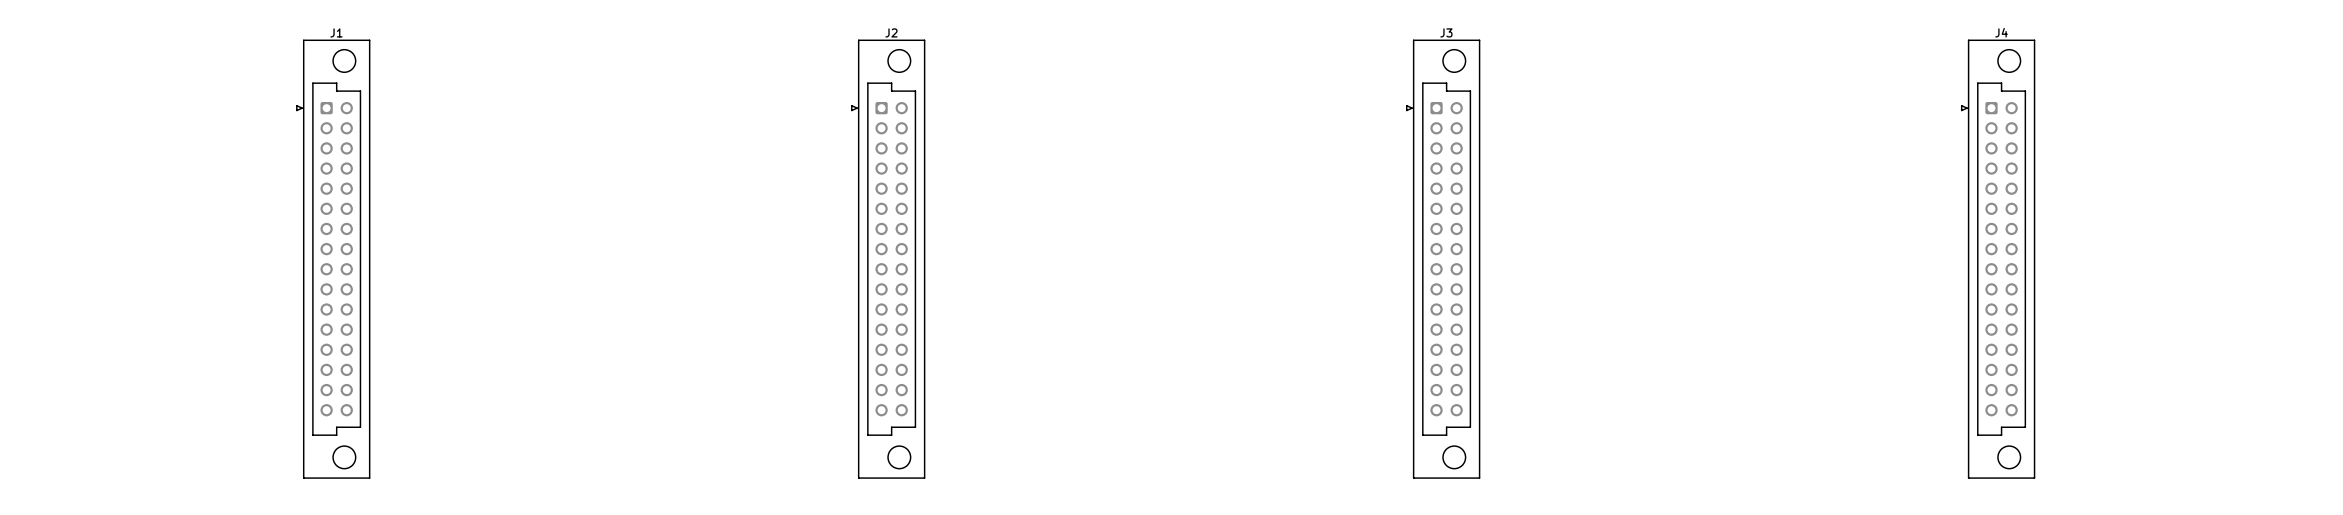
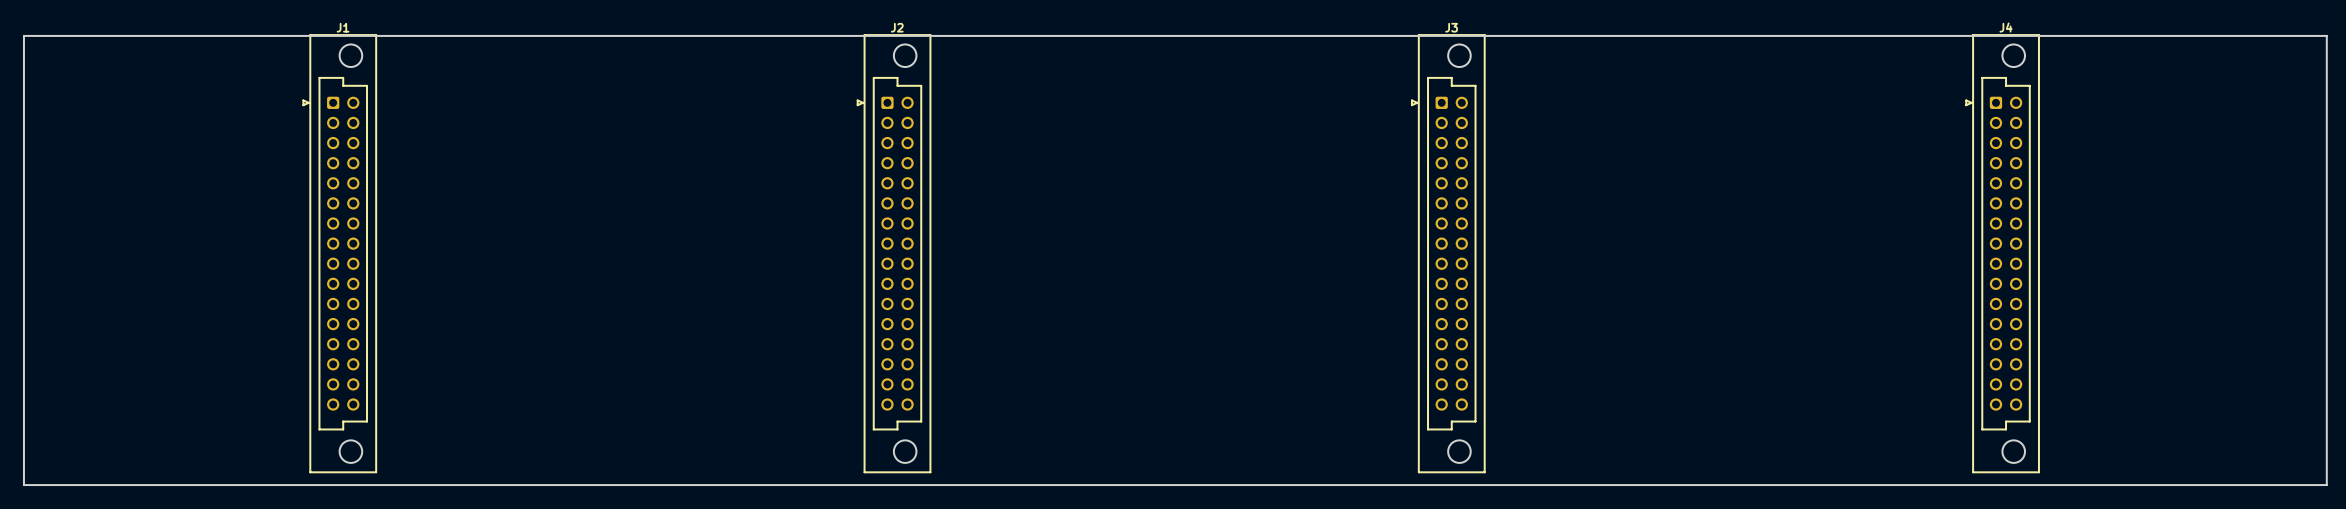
board edge: none -> (23, 35) (2326, 35) (2326, 485) (23, 485) (23, 35)

